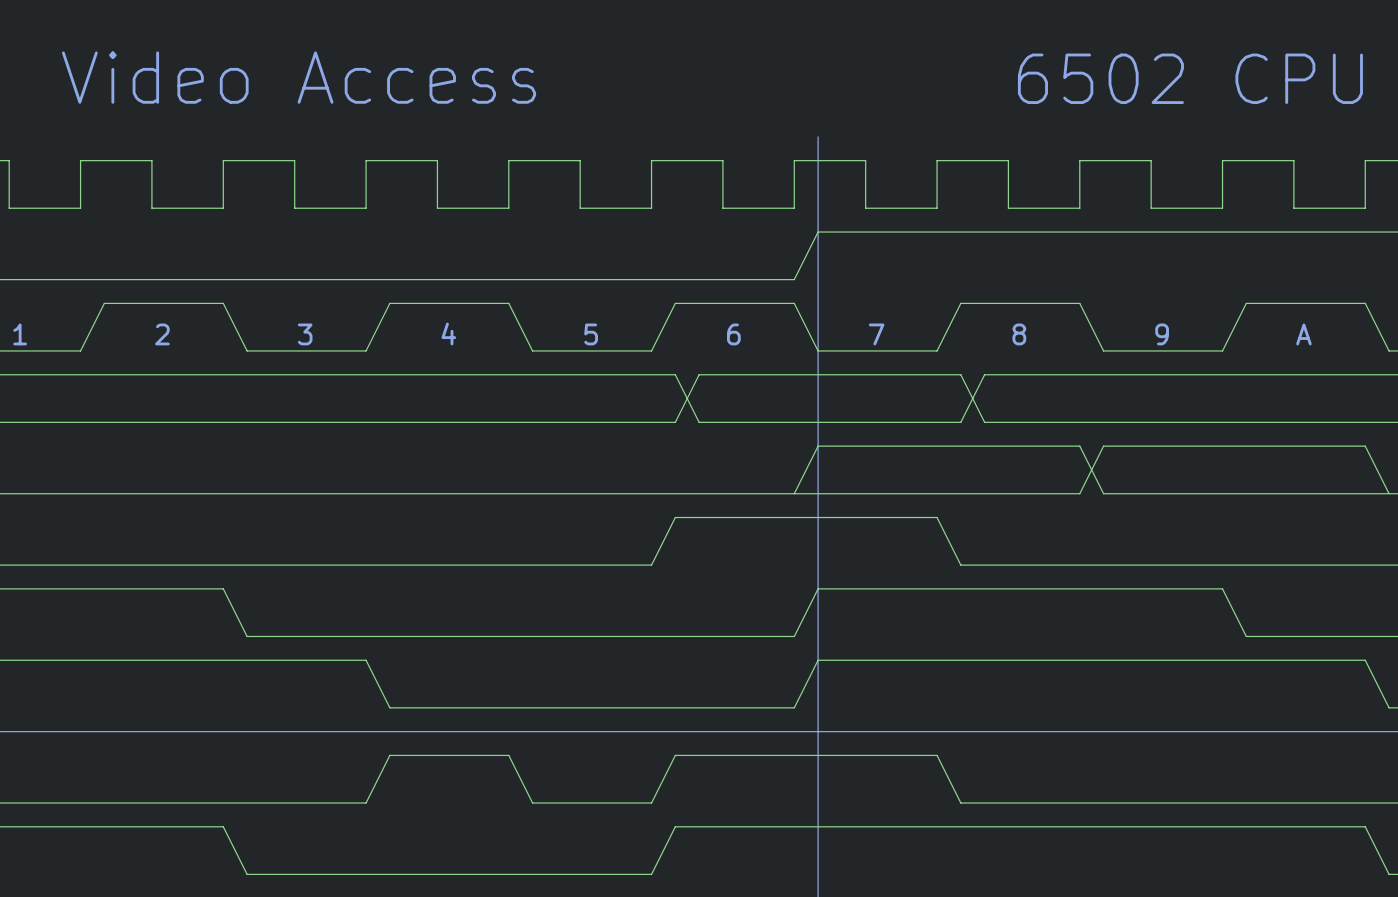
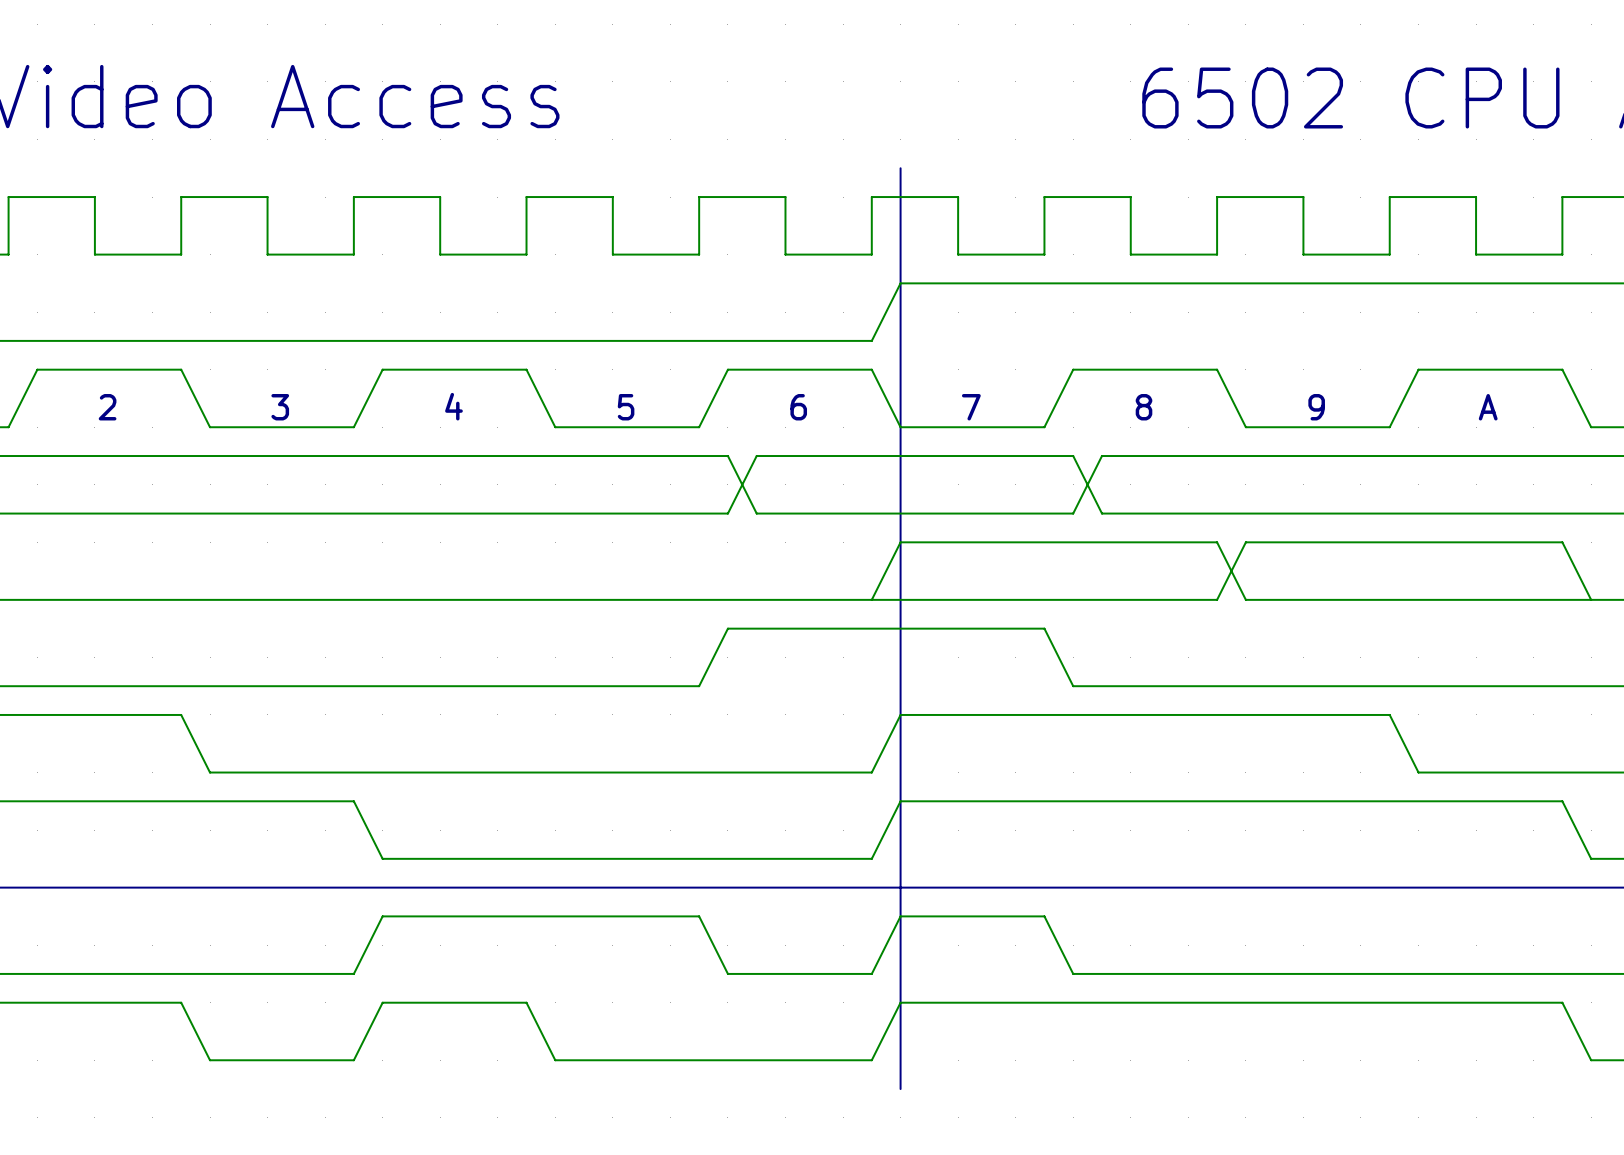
wire: (508, 755) (532, 803) (651, 803) (675, 755) (818, 755) -> (526, 916) (699, 916) (727, 973) (871, 973) (900, 916)
wire: (818, 826) (675, 826) (651, 874) -> (900, 1002) (871, 1060) (699, 1060)
wire: (366, 874) (532, 874) -> (353, 1060) (382, 1002) (526, 1002) (555, 1060)

